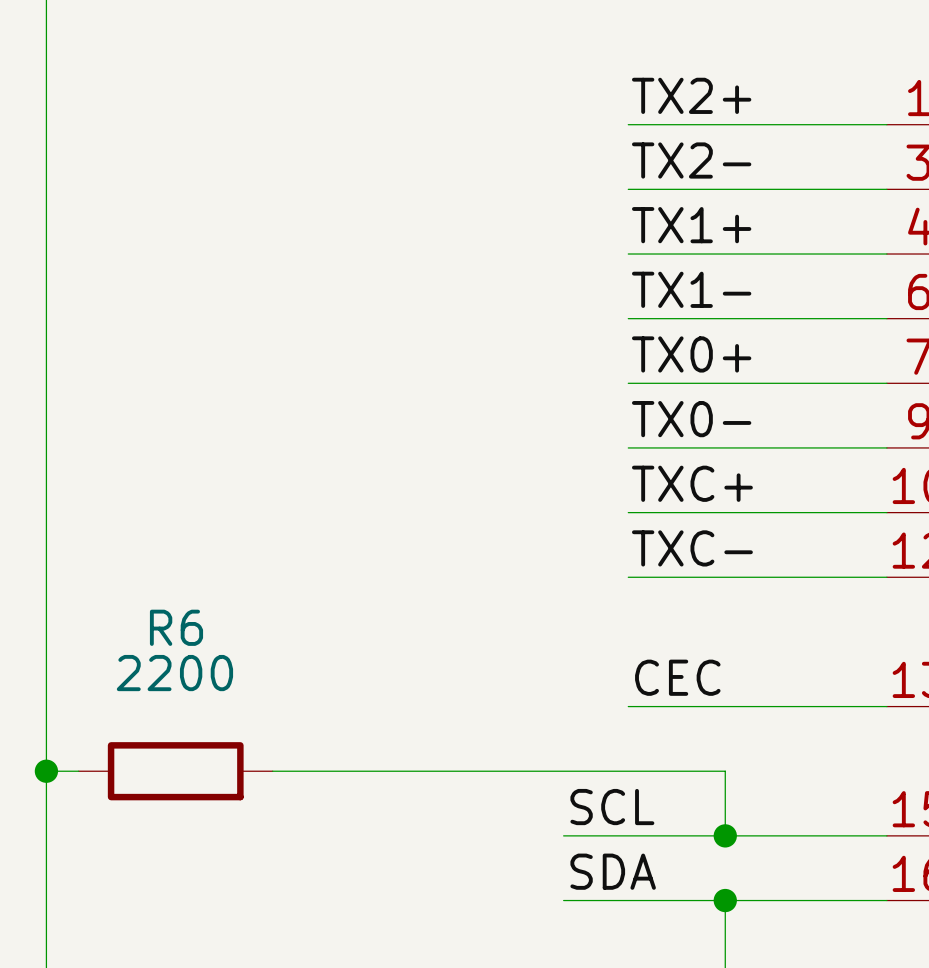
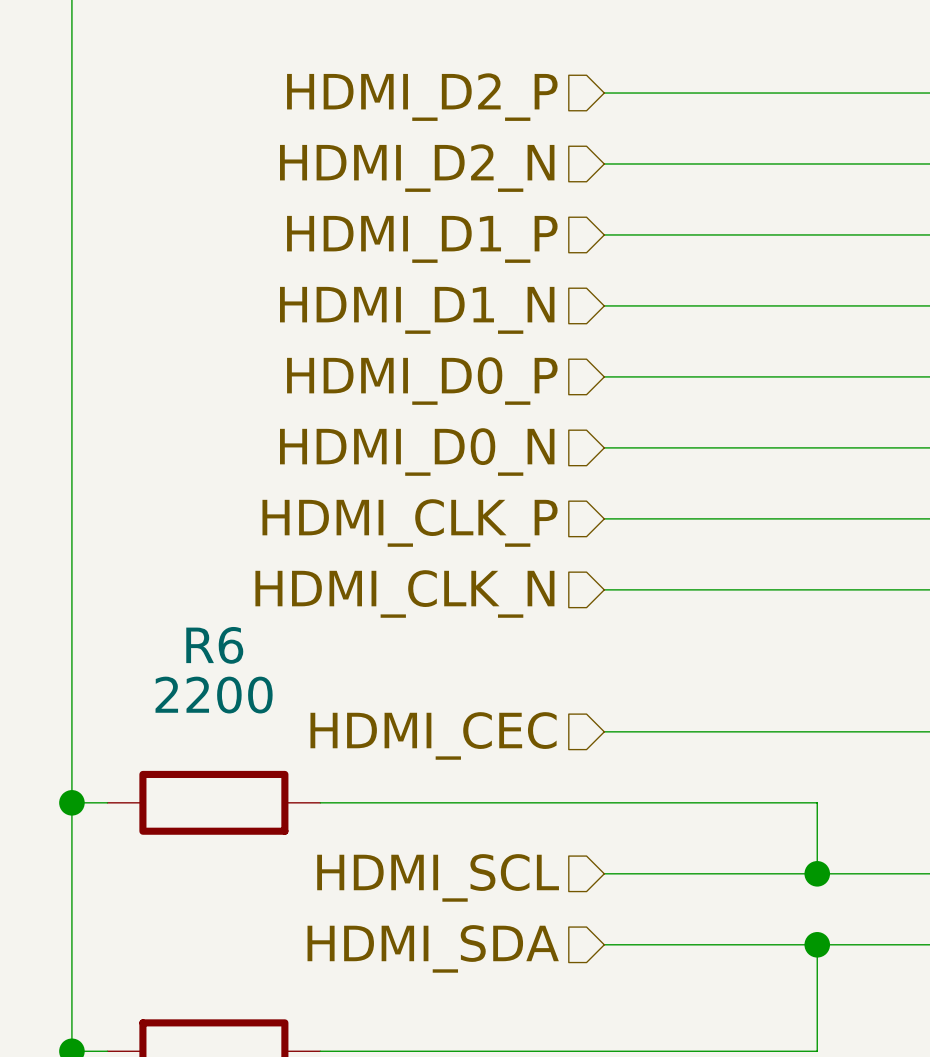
label: TX2+ (691, 95) -> none
wire: none -> (604, 93) (710, 93)
hierarchical label: none -> HDMI_D2_P (422, 97)
label: TX2- (691, 160) -> none
hierarchical label: none -> HDMI_D2_N (417, 168)
wire: none -> (604, 163) (710, 163)
label: TX1+ (691, 225) -> none
hierarchical label: none -> HDMI_D1_P (422, 239)
wire: none -> (604, 234) (710, 234)
label: TX1- (691, 289) -> none
hierarchical label: none -> HDMI_D1_N (417, 310)
wire: none -> (604, 305) (710, 305)
label: TX0+ (691, 354) -> none
hierarchical label: none -> HDMI_D0_P (422, 381)
wire: none -> (604, 376) (710, 376)
label: TX0- (691, 419) -> none
wire: none -> (604, 447) (710, 447)
hierarchical label: none -> HDMI_D0_N (417, 452)
label: TXC+ (692, 483) -> none
hierarchical label: none -> HDMI_CLK_P (410, 522)
wire: none -> (604, 518) (710, 518)
label: TXC- (692, 548) -> none
hierarchical label: none -> HDMI_CLK_N (404, 593)
wire: none -> (604, 589) (710, 589)
label: CEC (677, 677) -> none
hierarchical label: none -> HDMI_CEC (433, 735)
wire: none -> (604, 731) (710, 731)
label: SCL (612, 807) -> none
wire: none -> (604, 873) (639, 873)
hierarchical label: none -> HDMI_SCL (438, 877)
label: SDA (613, 871) -> none
hierarchical label: none -> HDMI_SDA (433, 948)
wire: none -> (604, 944) (639, 944)

